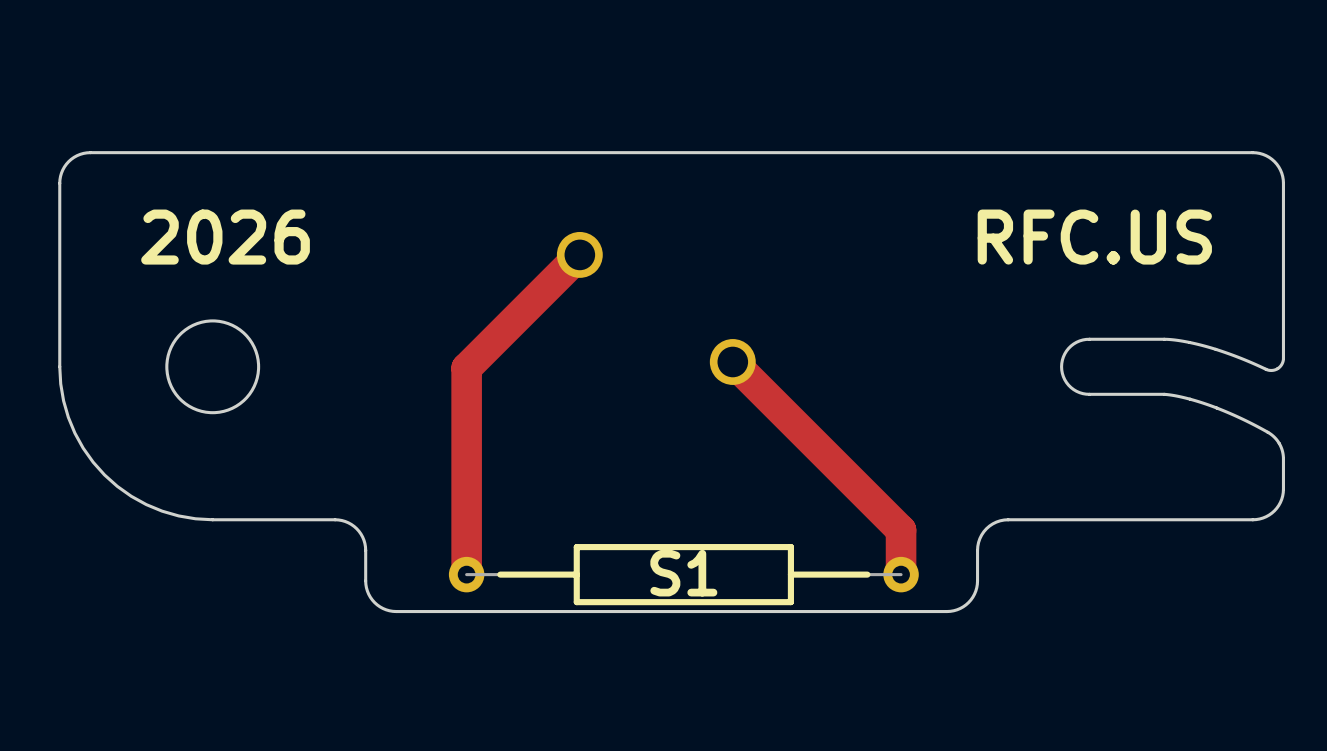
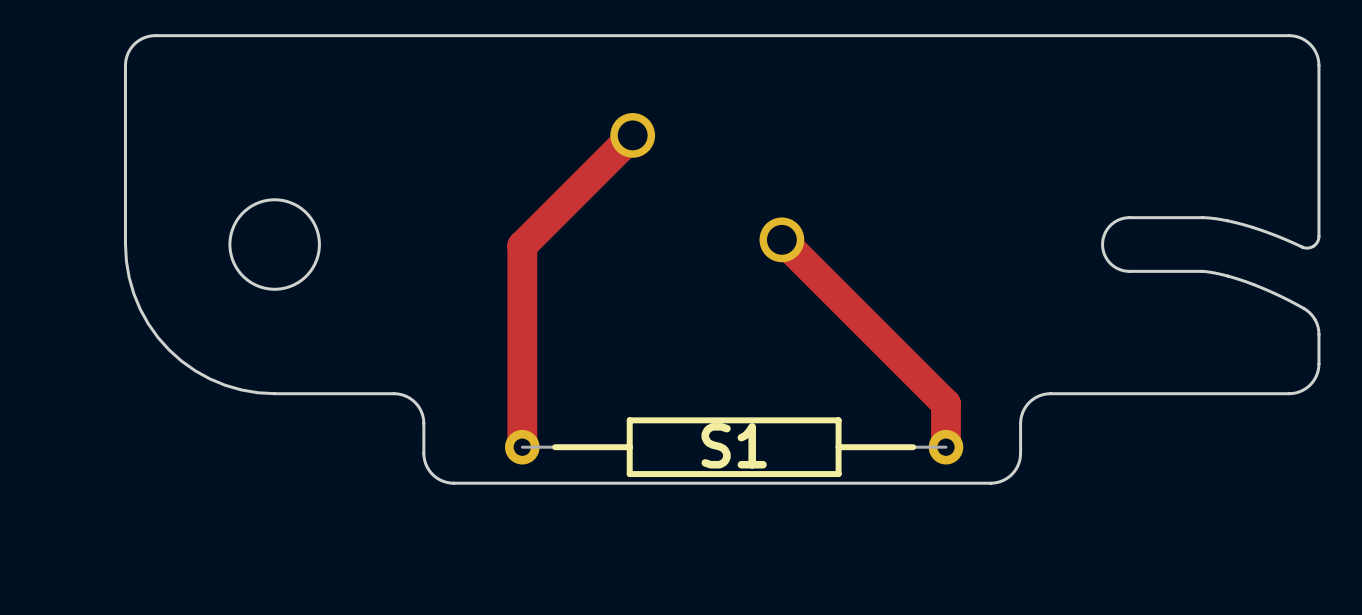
text: 2026 (225, 237) -> none
text: RFC.US (1094, 237) -> none

